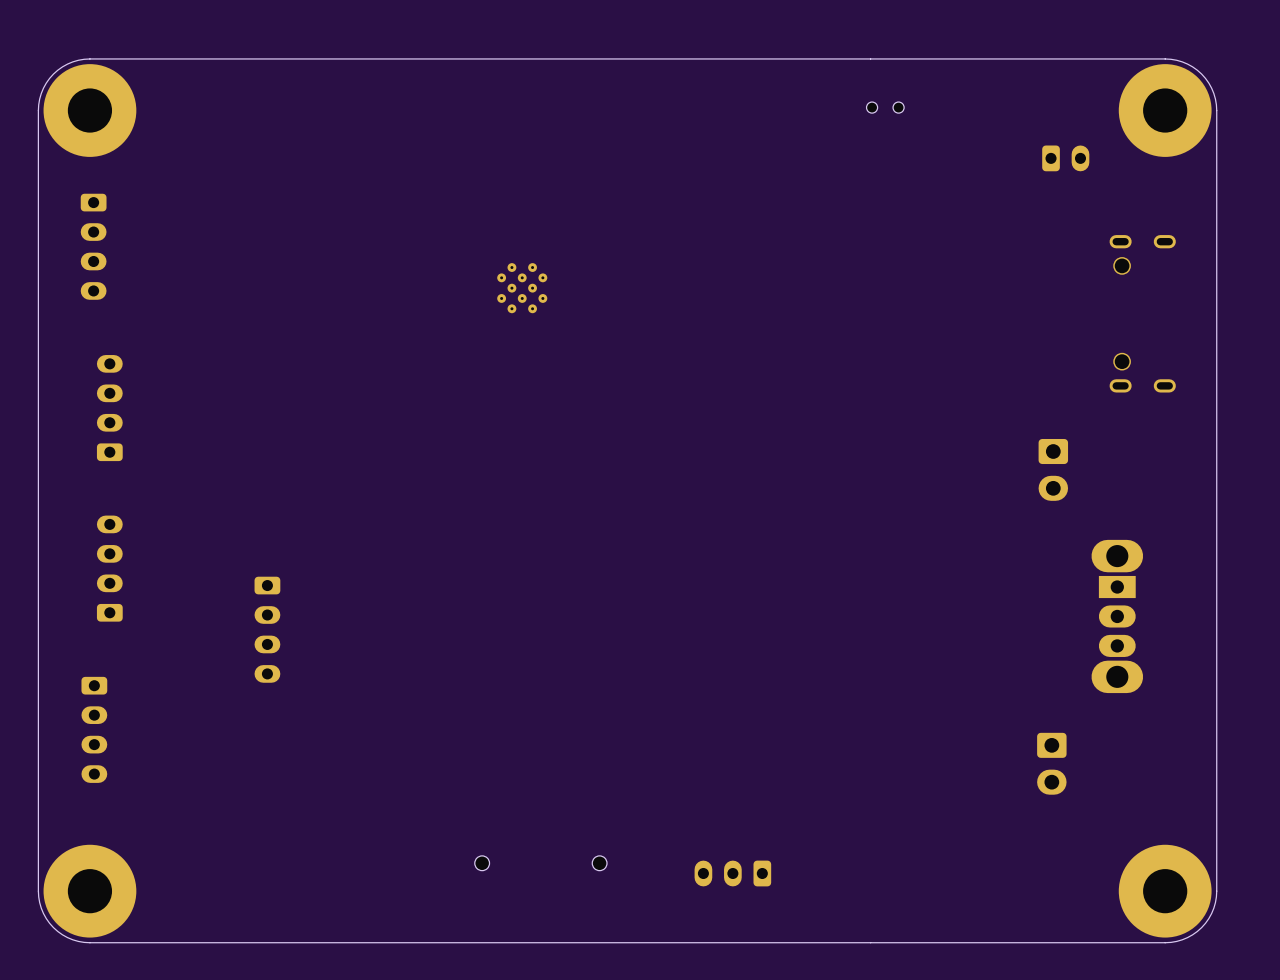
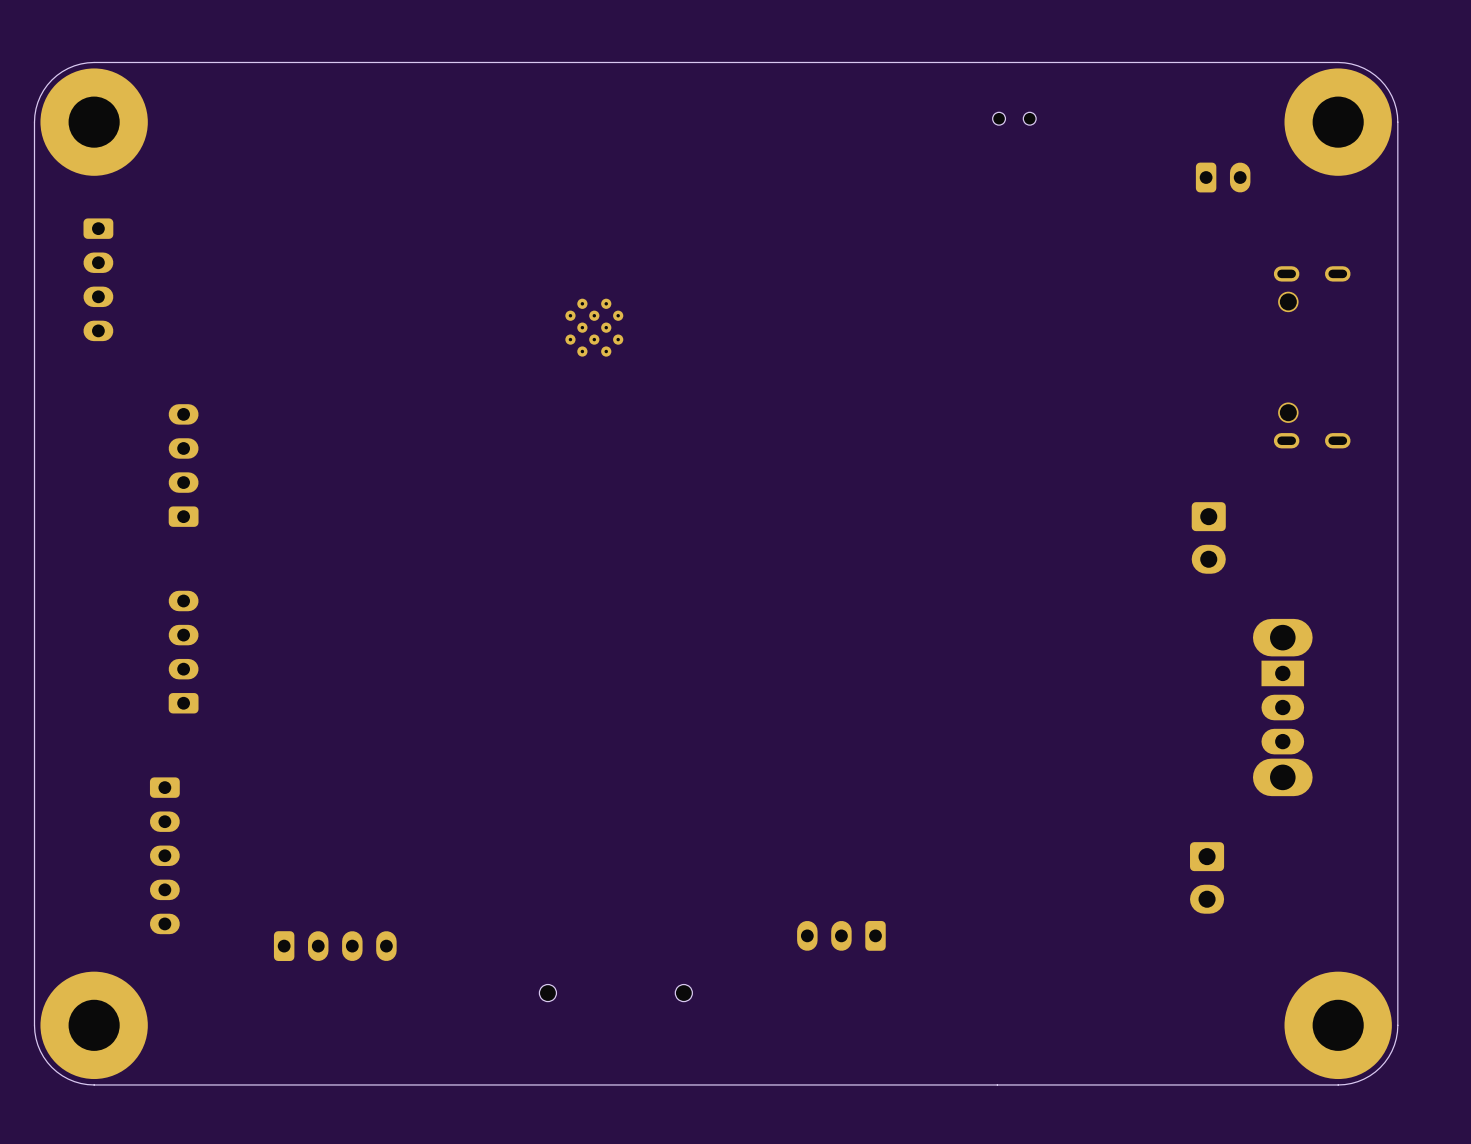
part position: (109, 408) -> (183, 465)
part position: (109, 568) -> (183, 652)
part: (267, 629) -> none
part: (94, 729) -> none
part: none -> (164, 855)
part: none -> (335, 946)
part position: (732, 873) -> (841, 935)

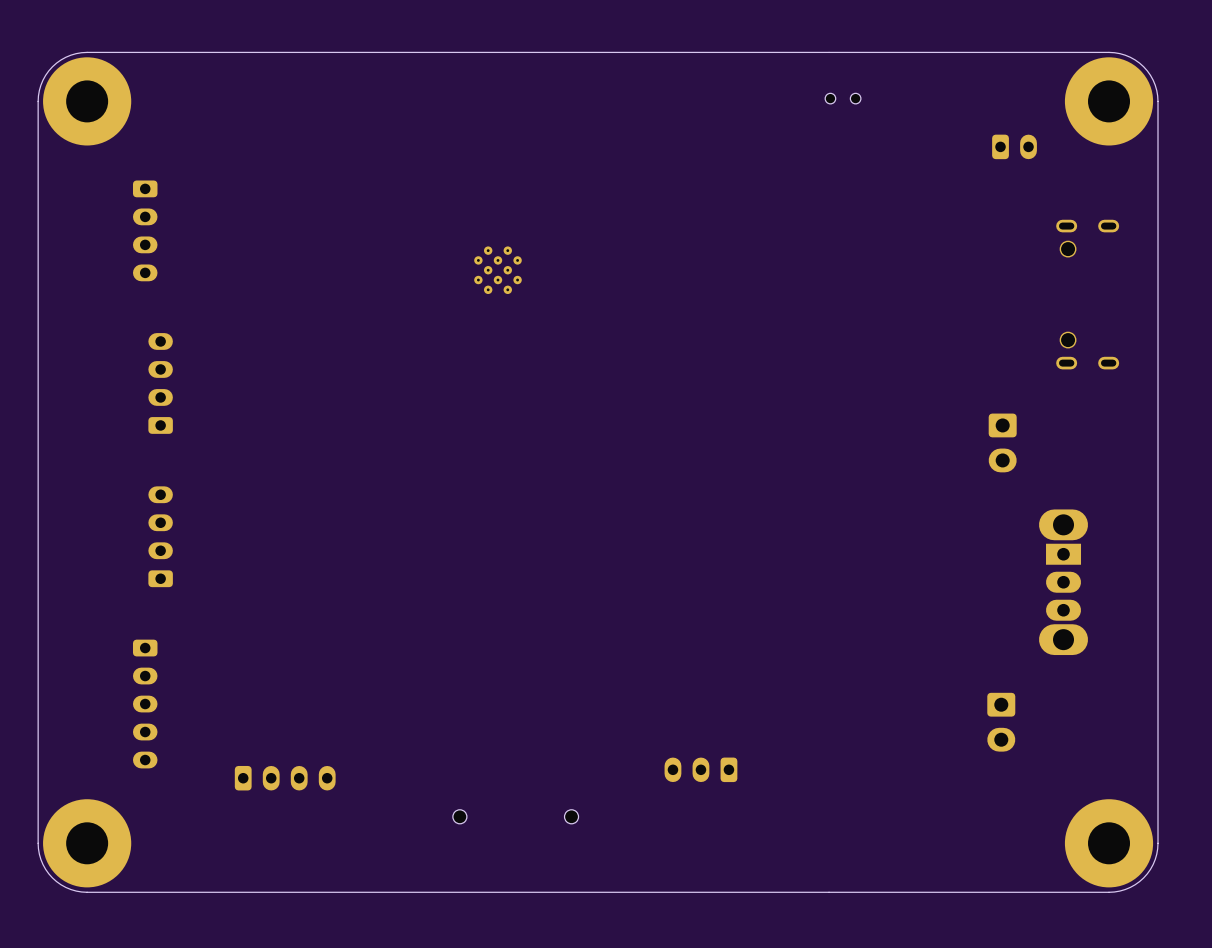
part position: (98, 279) -> (145, 230)

